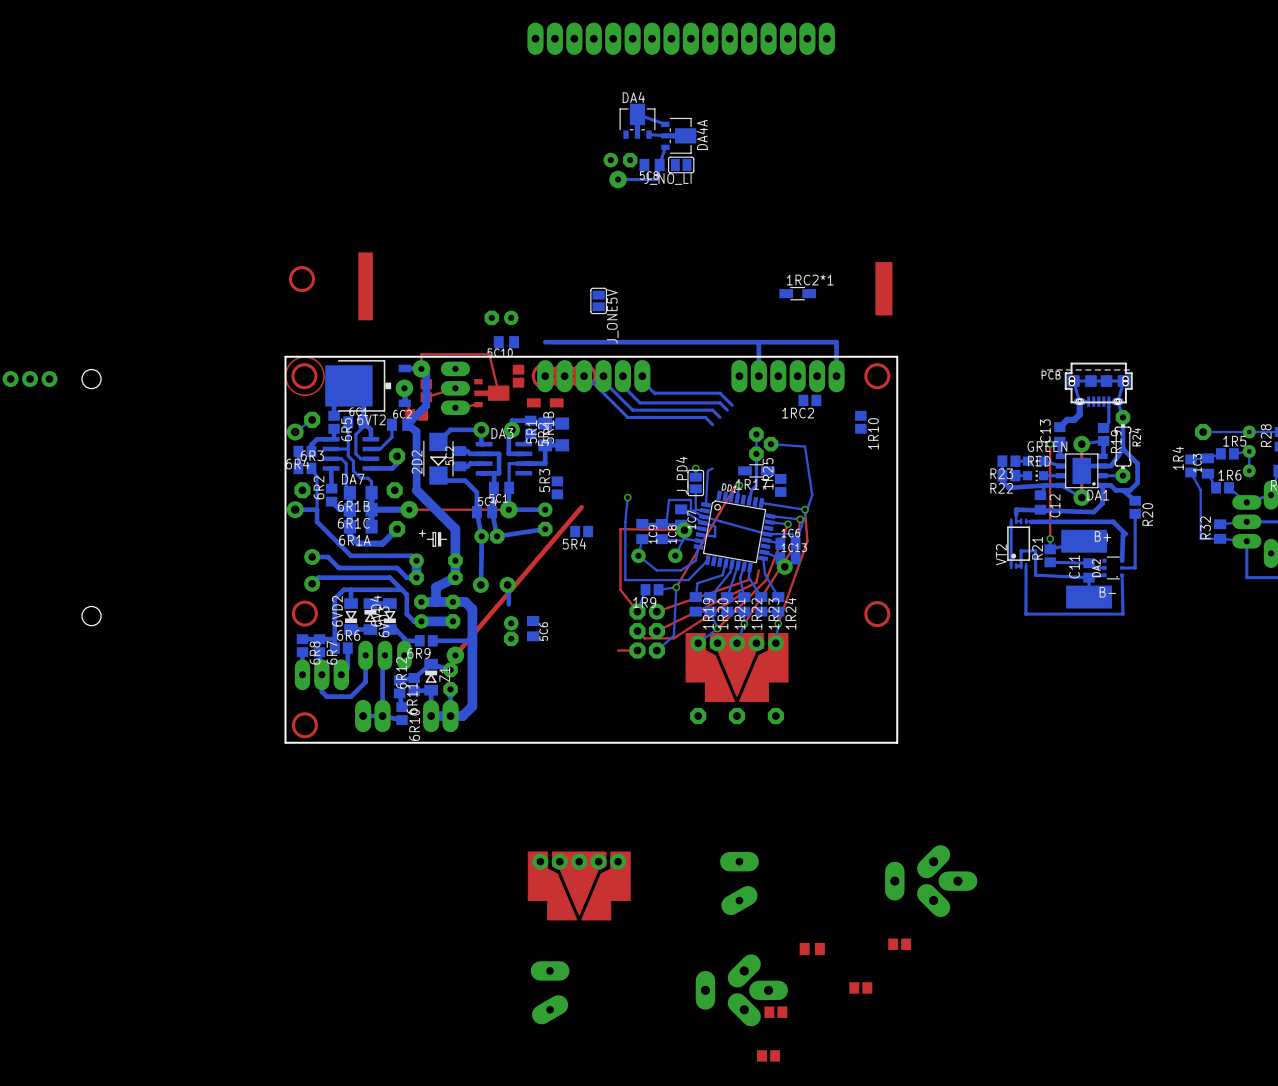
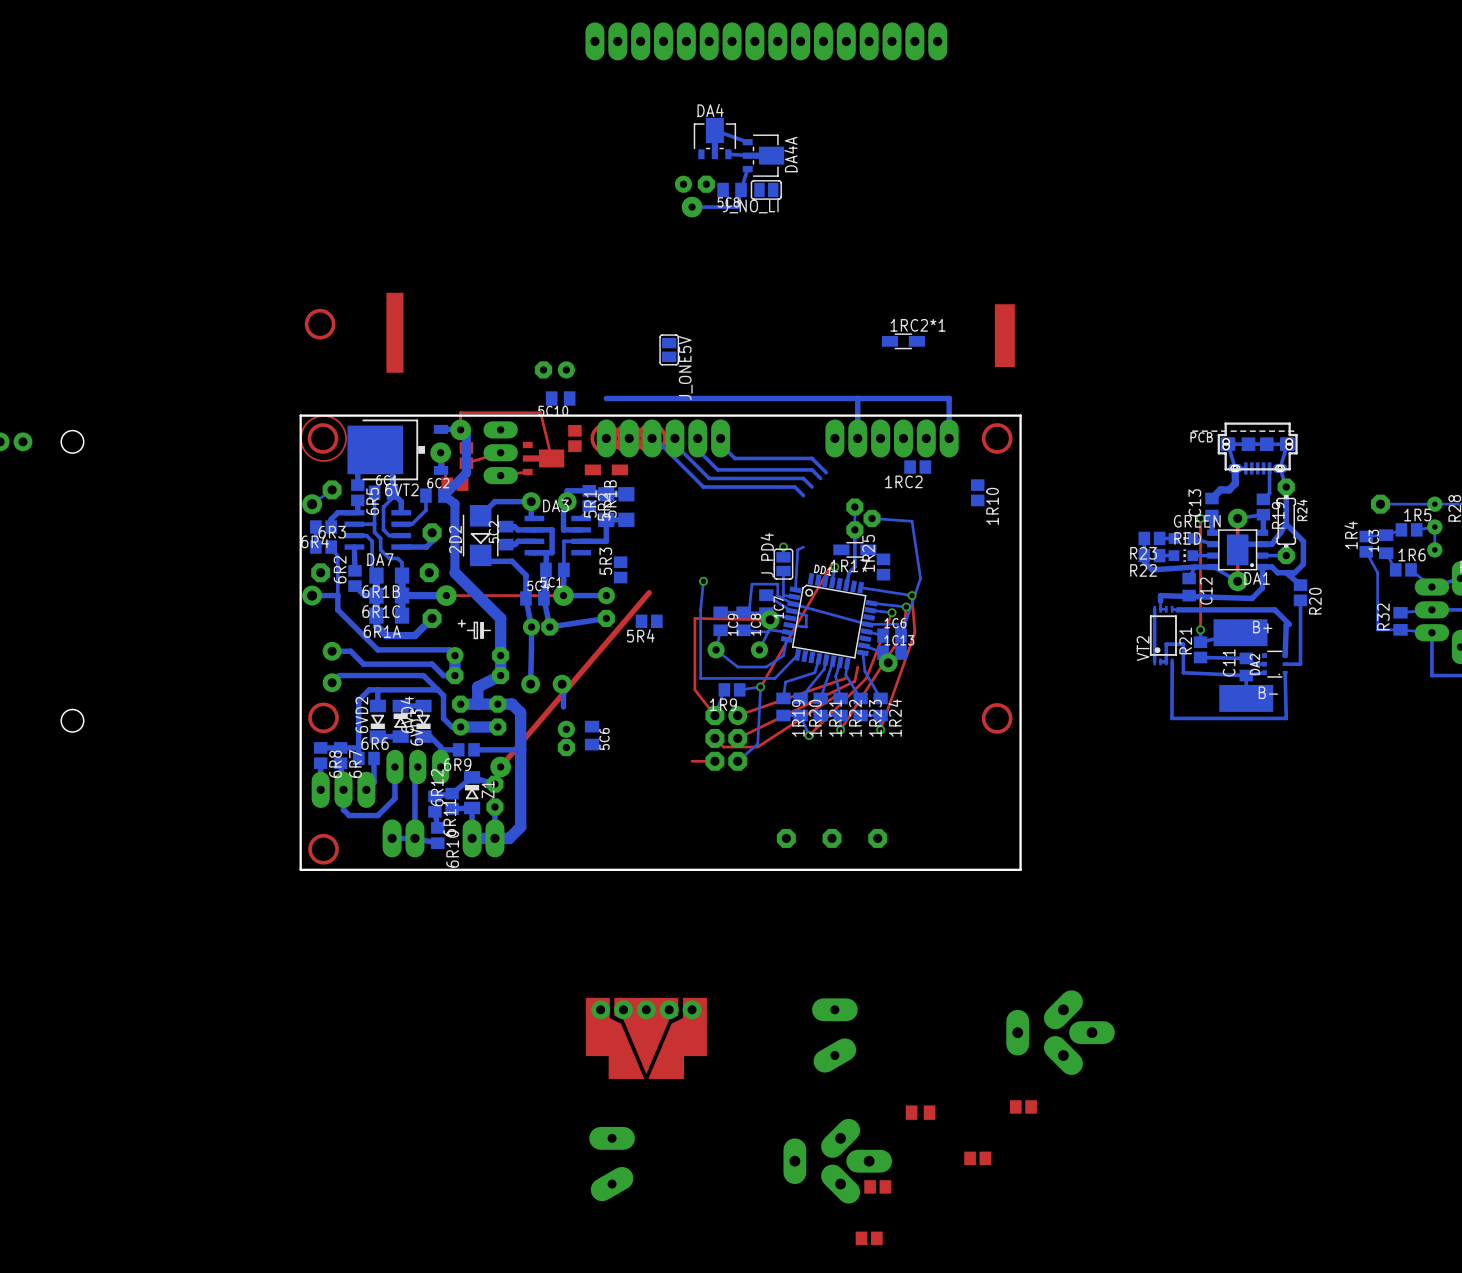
bottom track: (744, 623) (737, 643) -> none
bottom track: (778, 623) (775, 643) -> none
bottom track: (717, 628) (698, 643) -> none
part: (737, 667) -> none

